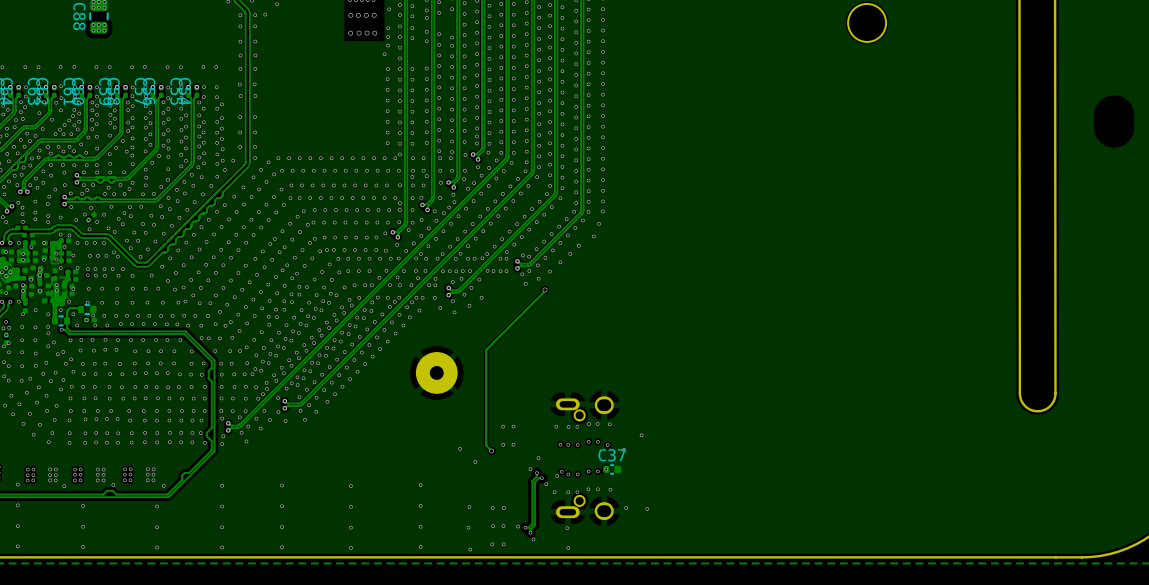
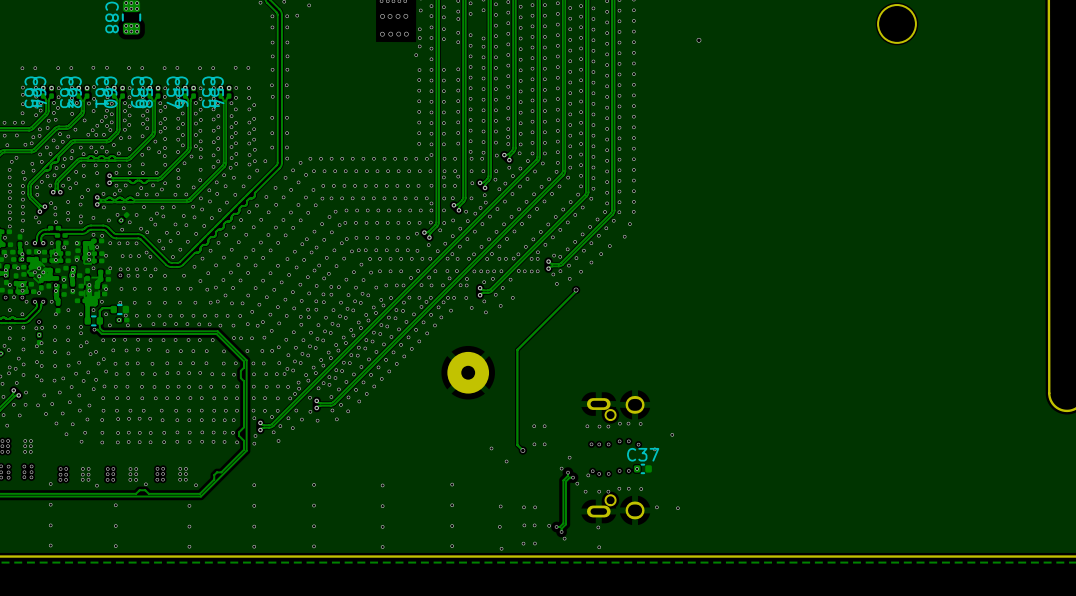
via: none -> (698, 40)

